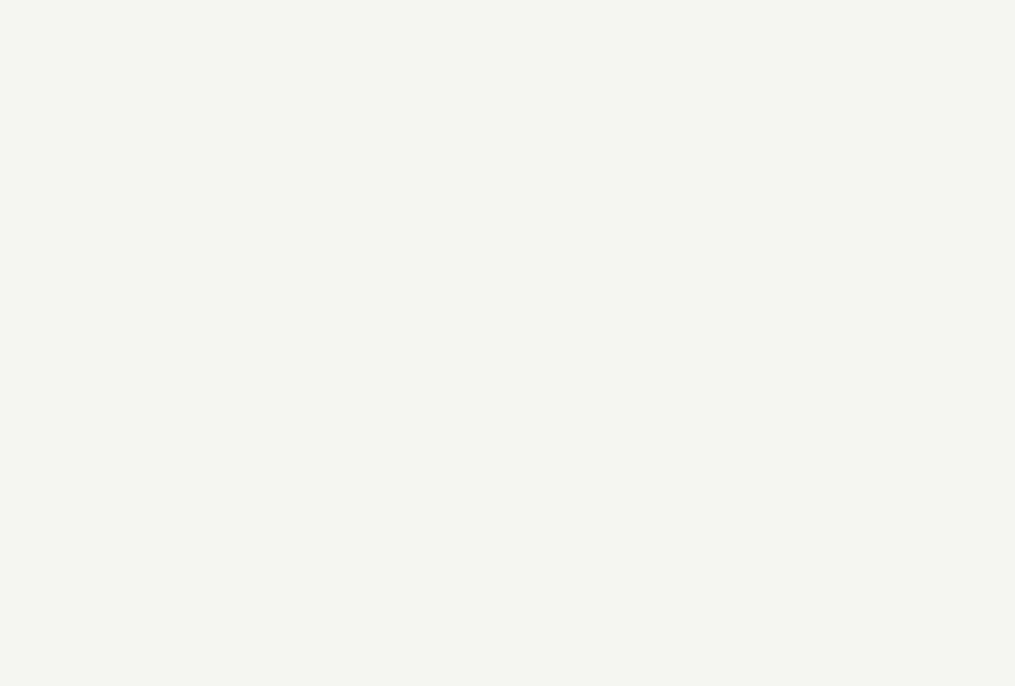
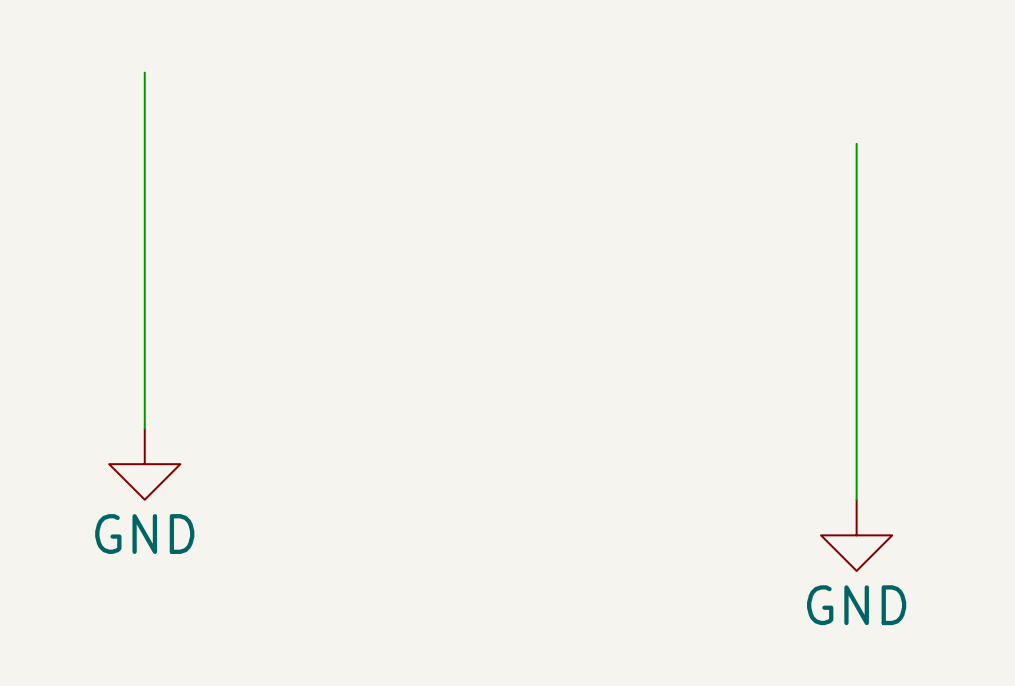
wire: none -> (144, 72) (144, 428)
wire: none -> (856, 143) (856, 499)
power symbol: none -> GND (144, 464)
power symbol: none -> GND (856, 535)

